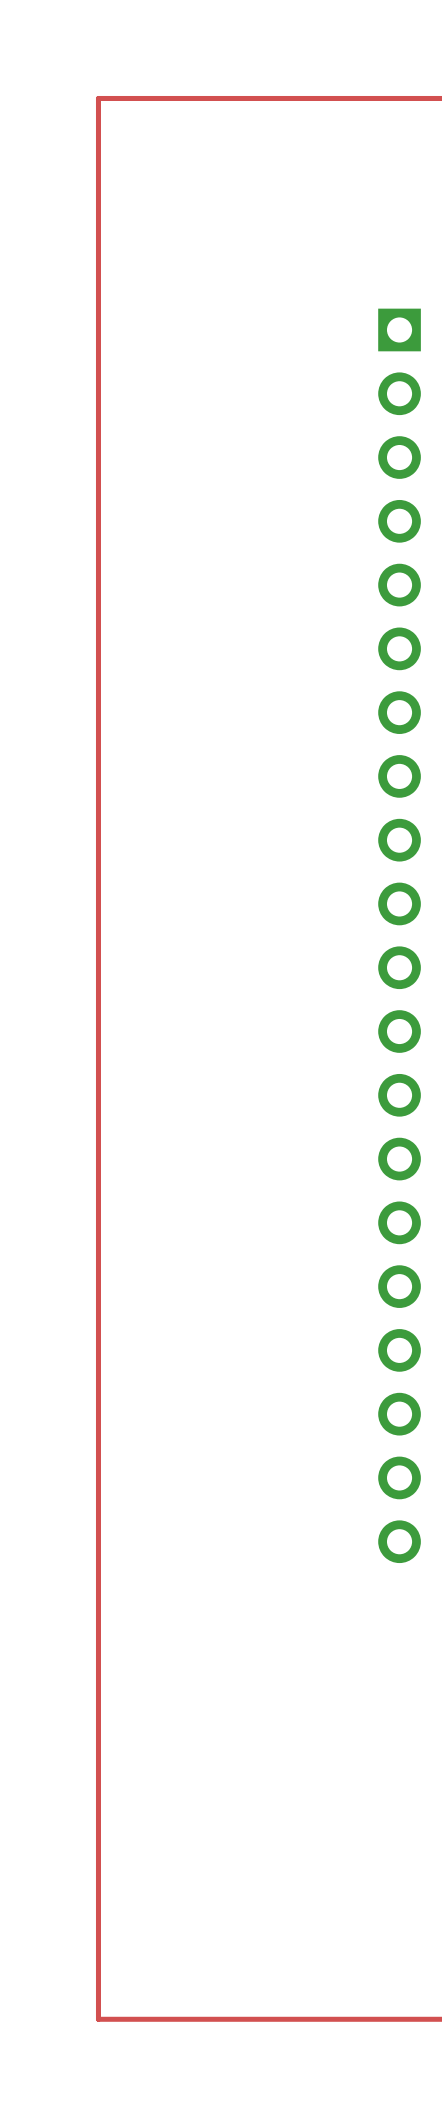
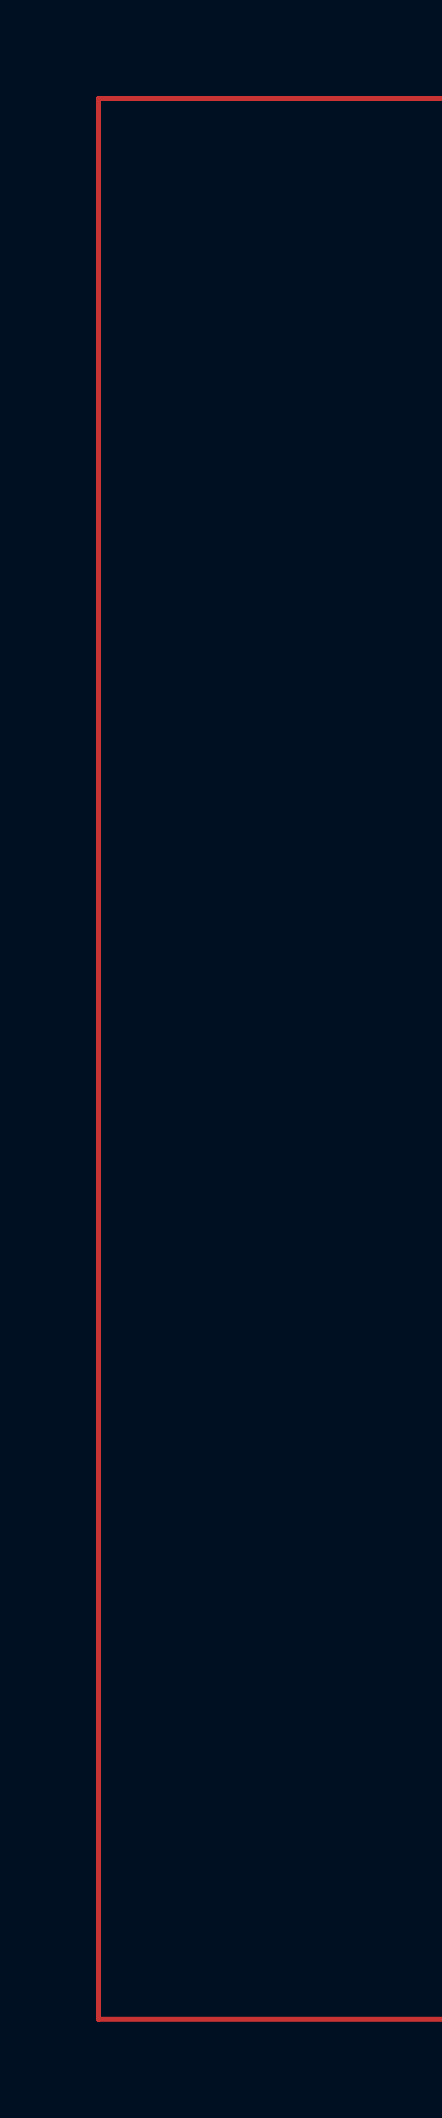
part: (399, 935) -> none

